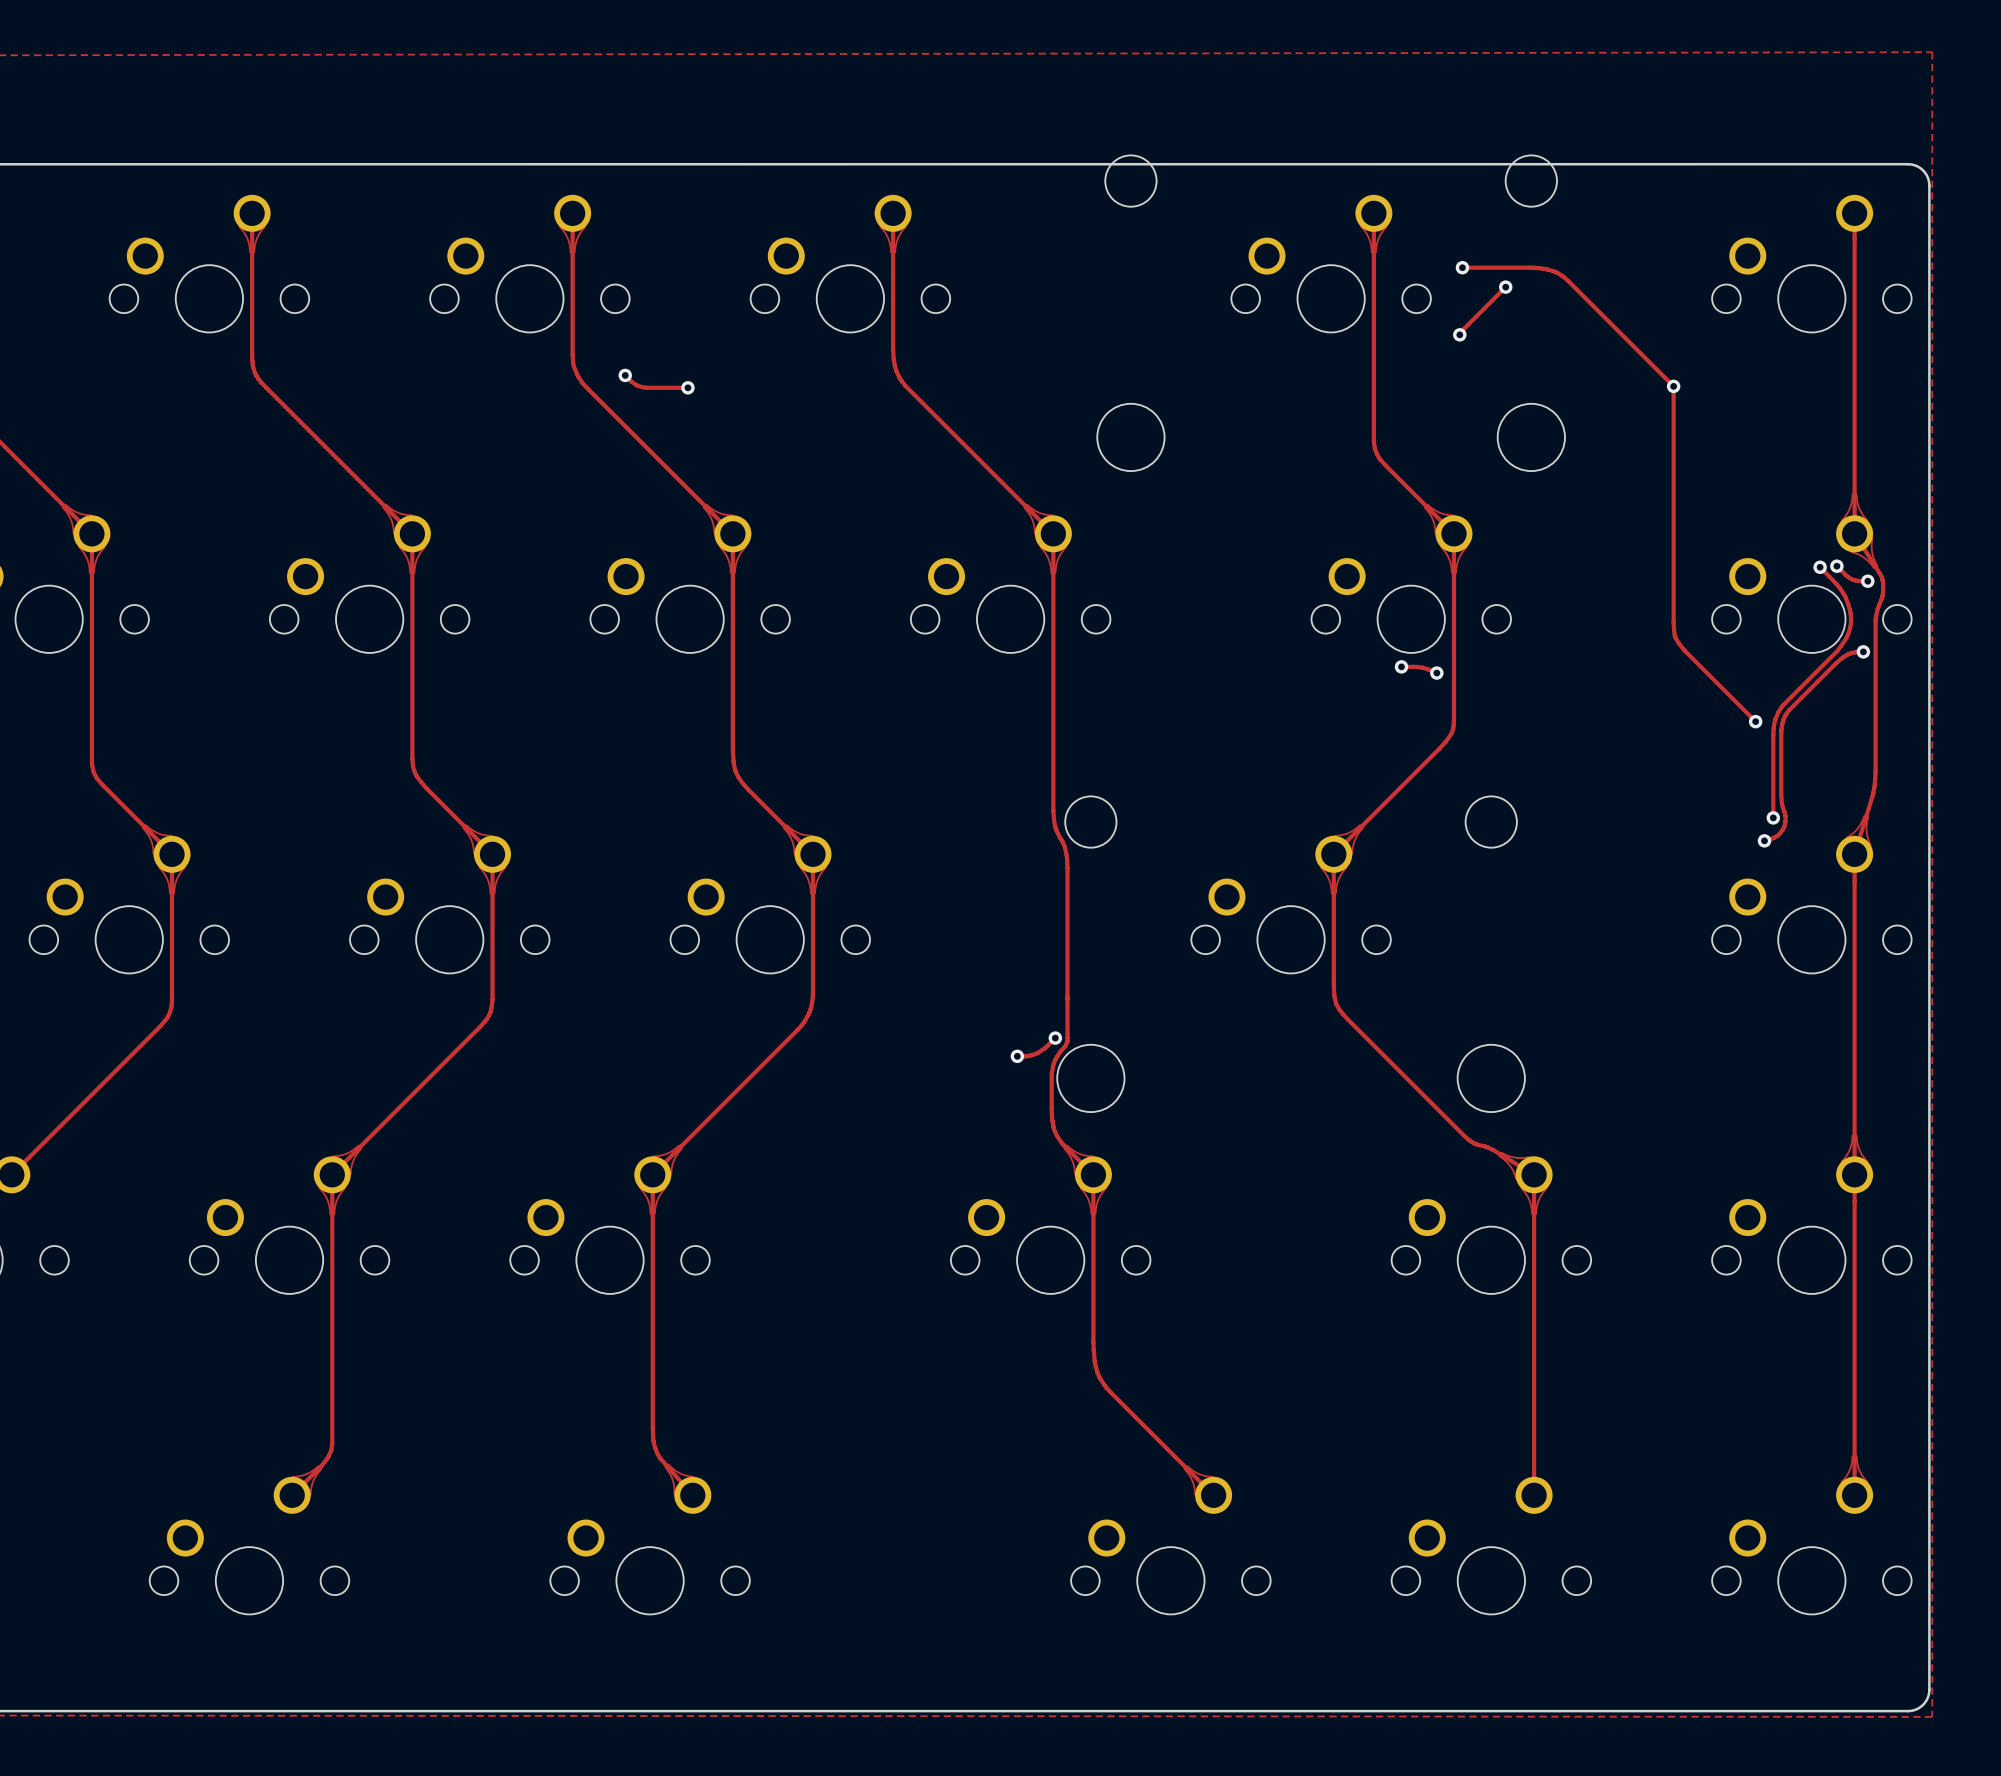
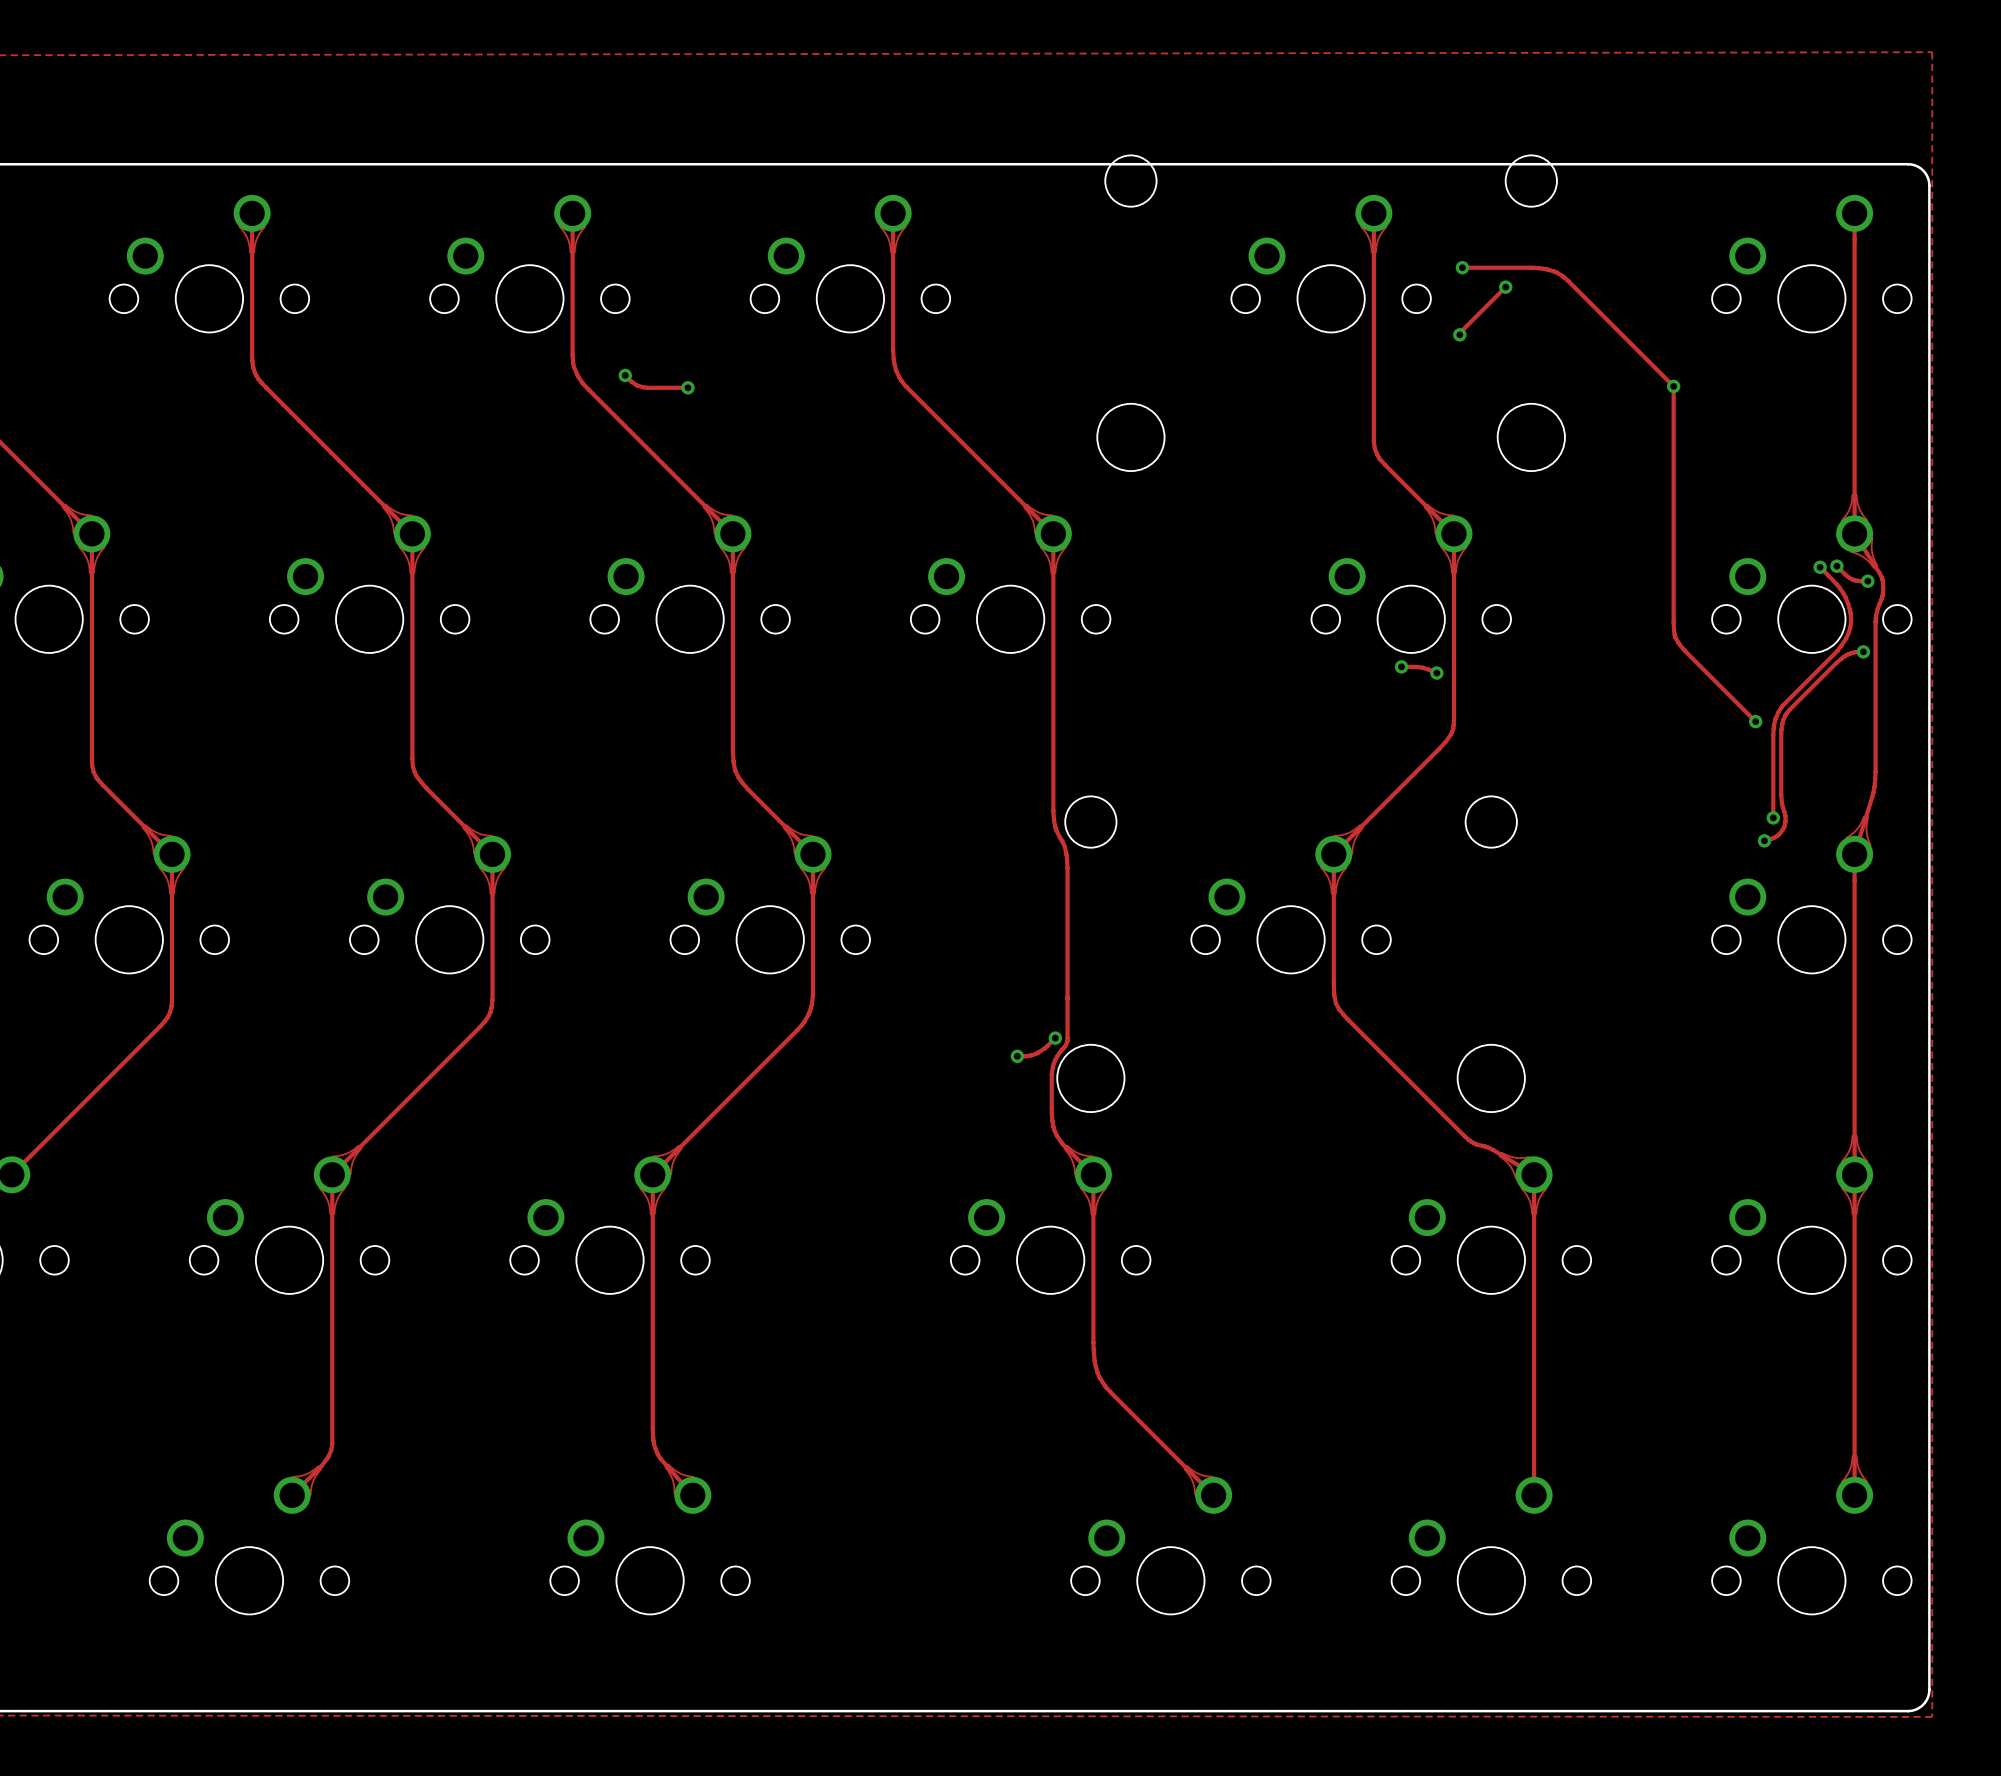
zone outline: none -> (1854, 1165) (1867, 1188) (1859, 1199) (1856, 1214) (1852, 1214) (1849, 1199) (1841, 1188) (1854, 1165)

